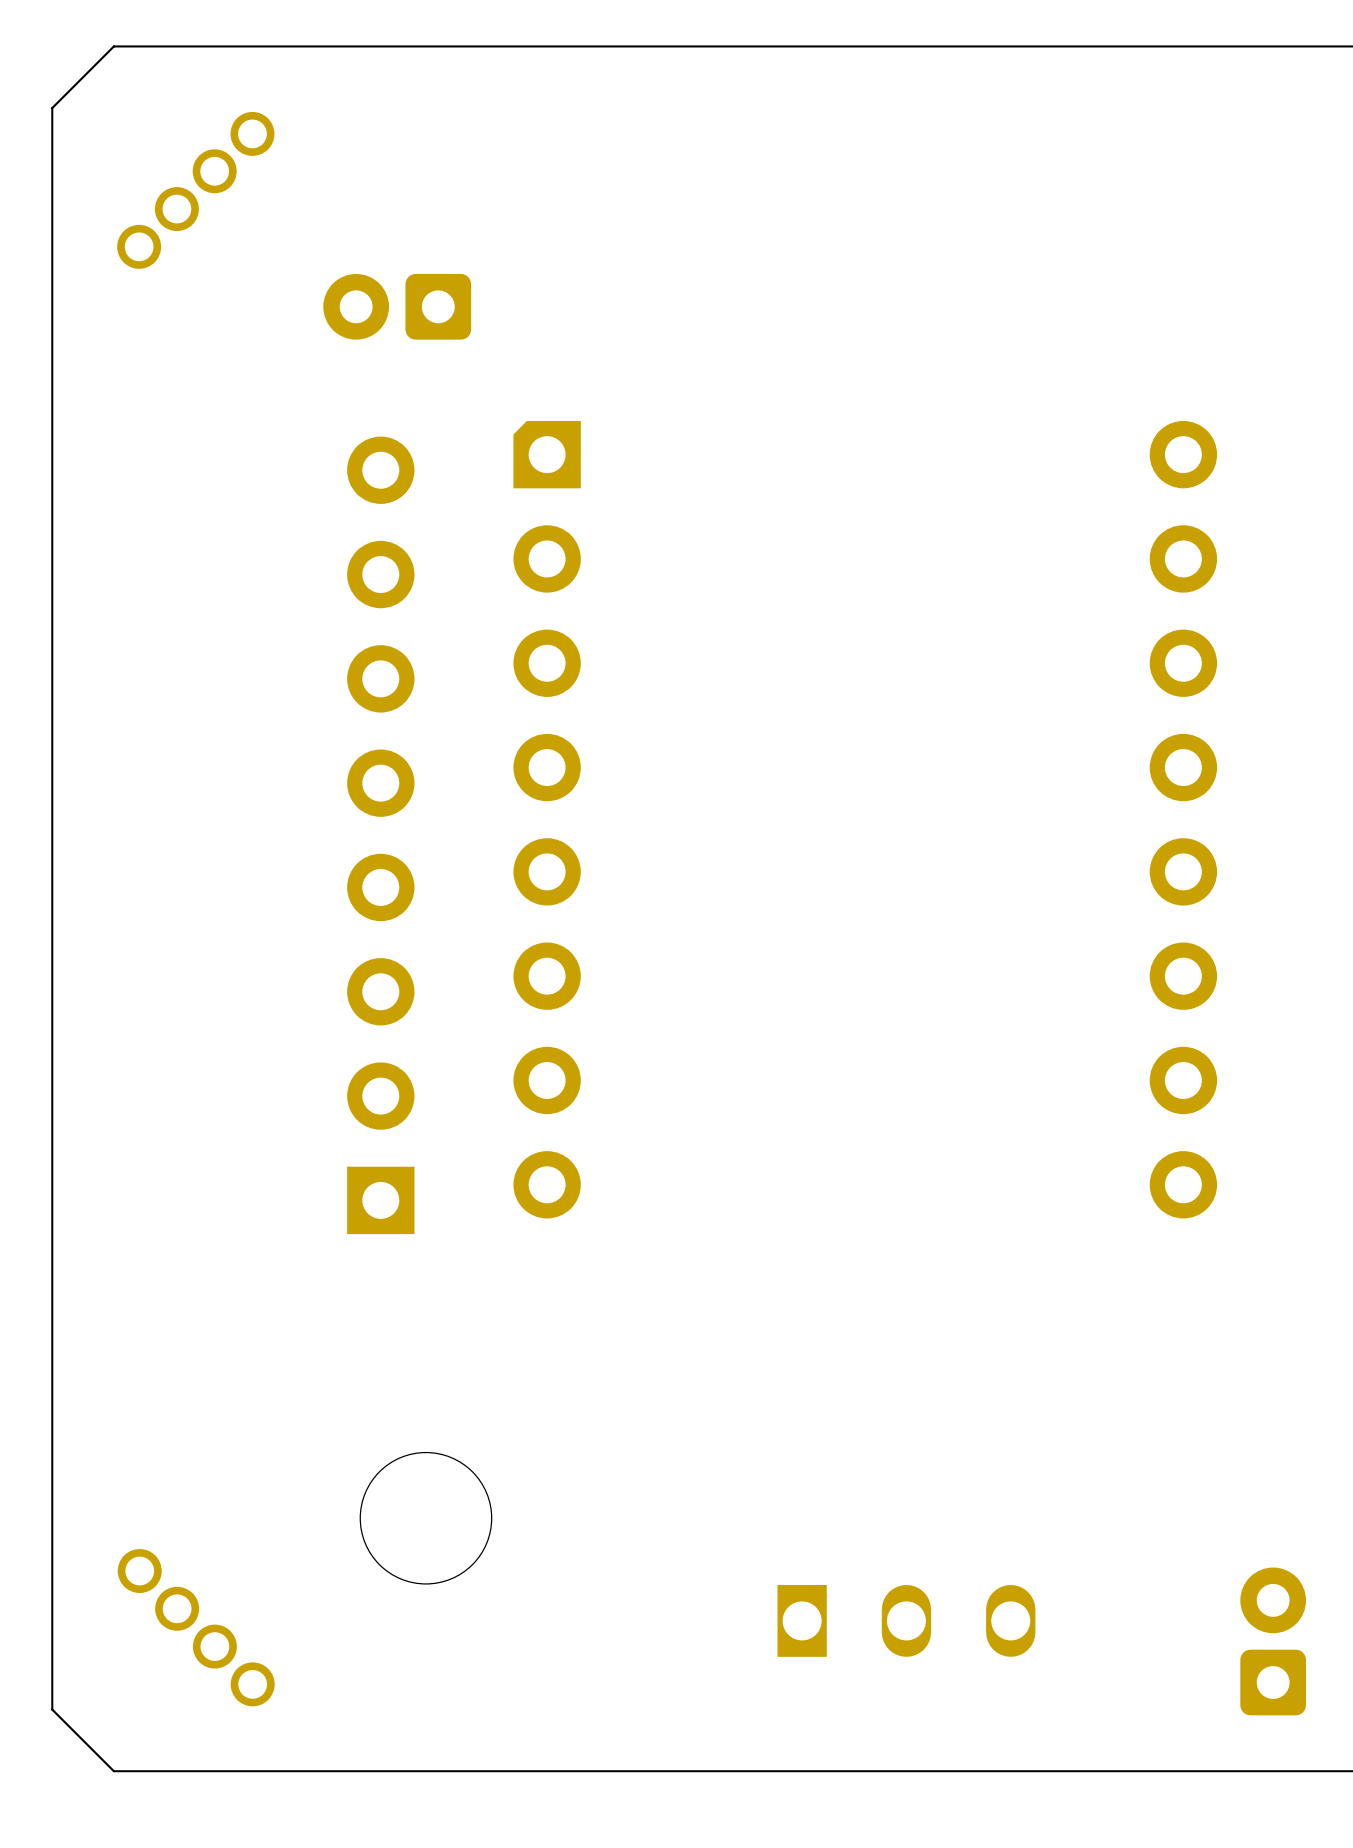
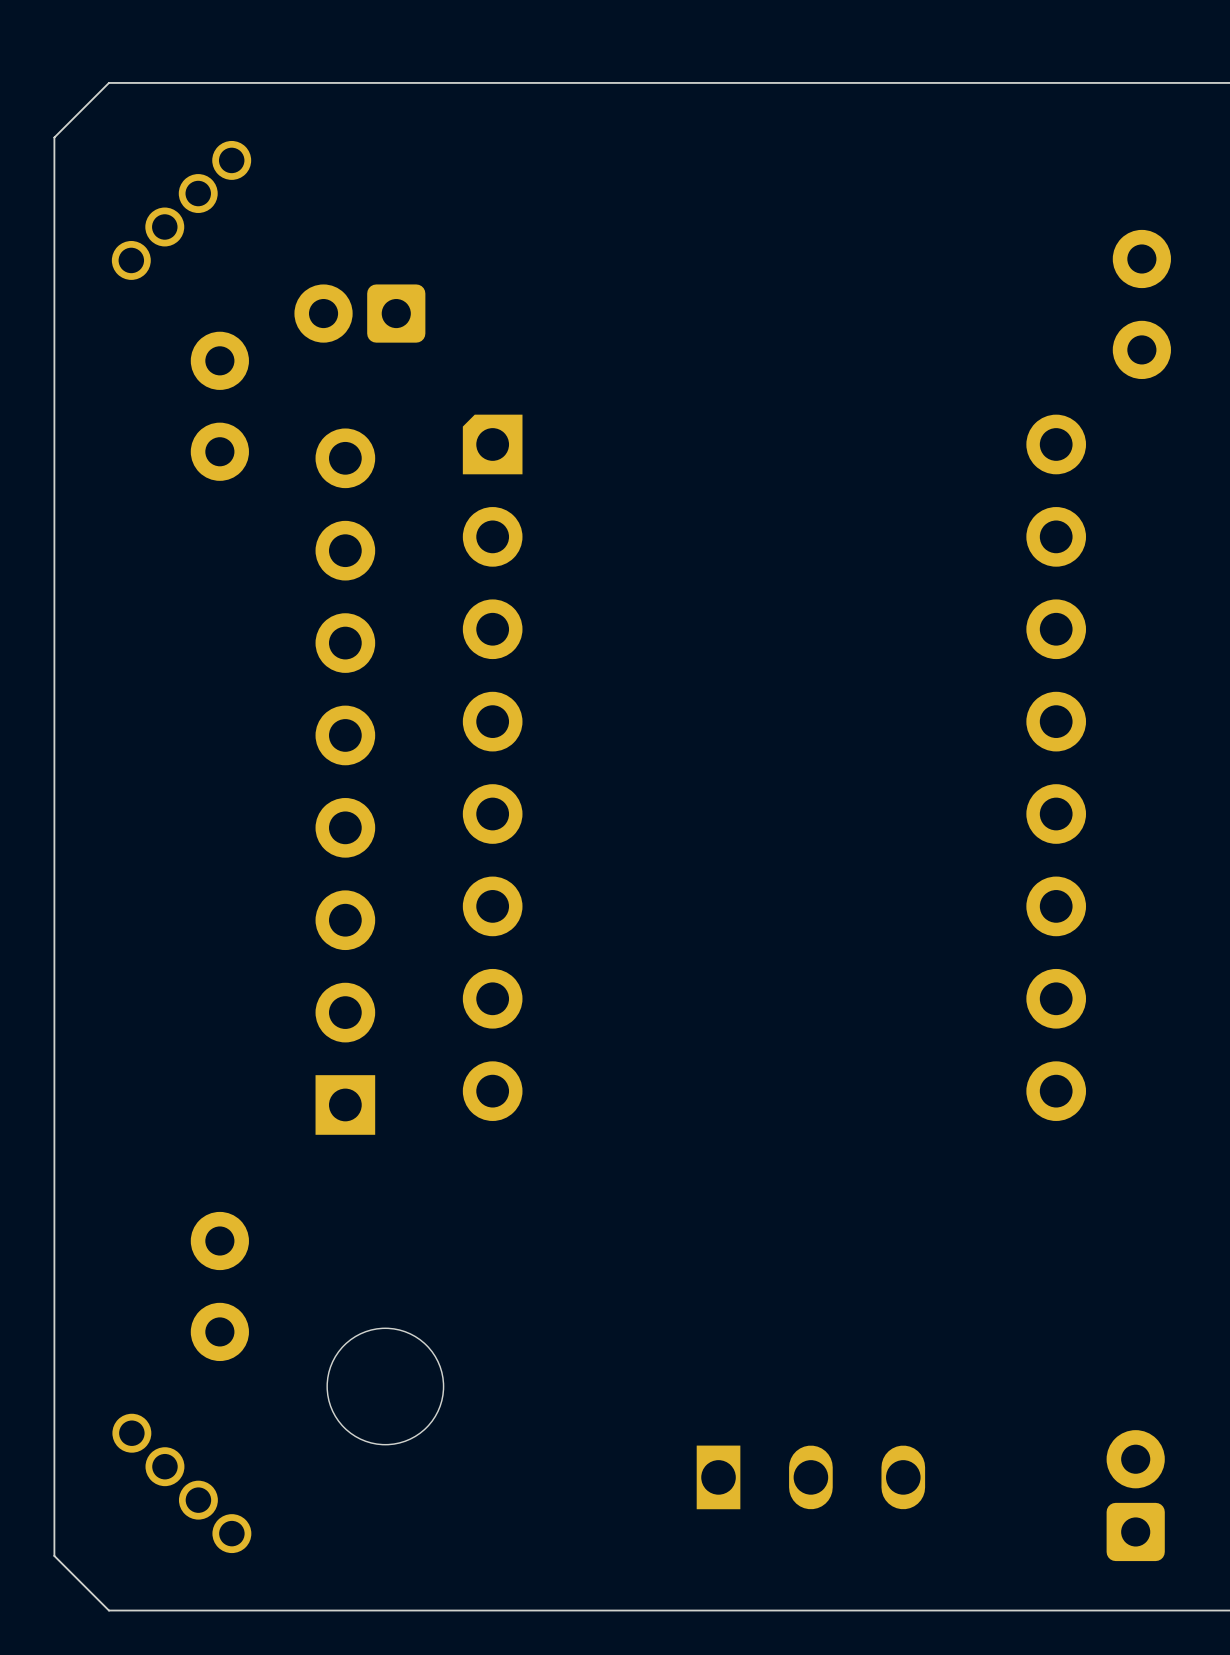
part: none -> (1141, 304)
part: none -> (219, 406)
part: none -> (219, 1286)

